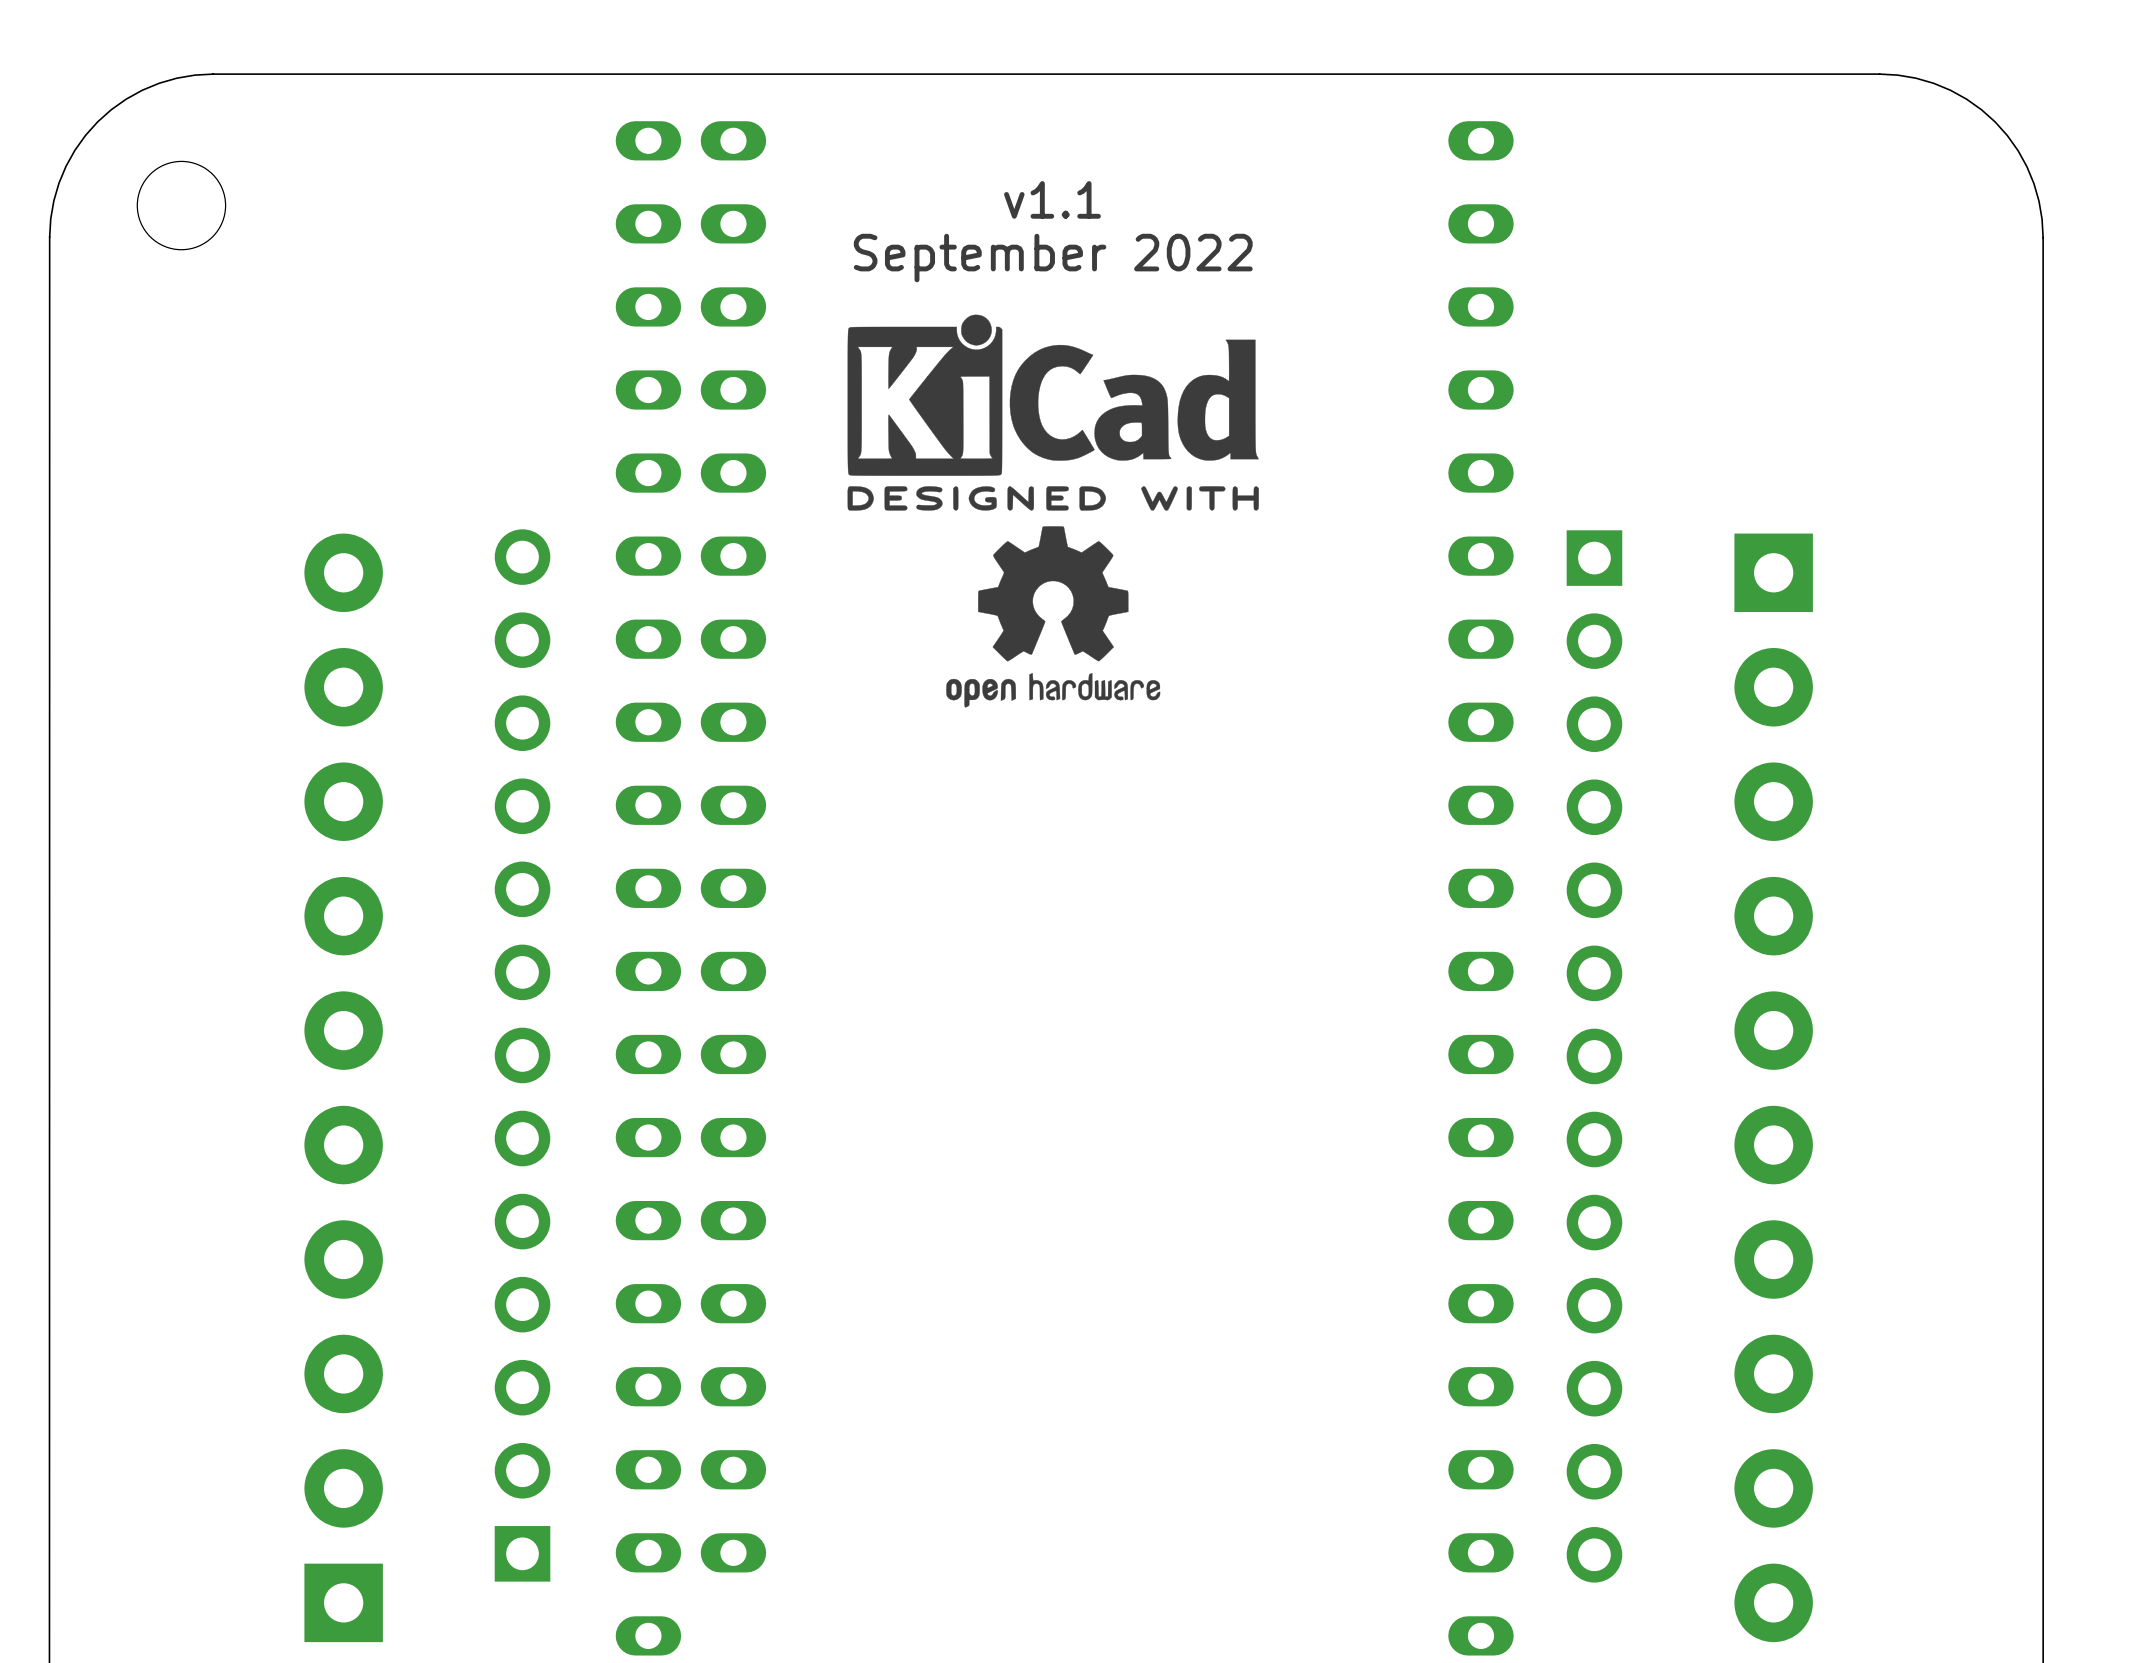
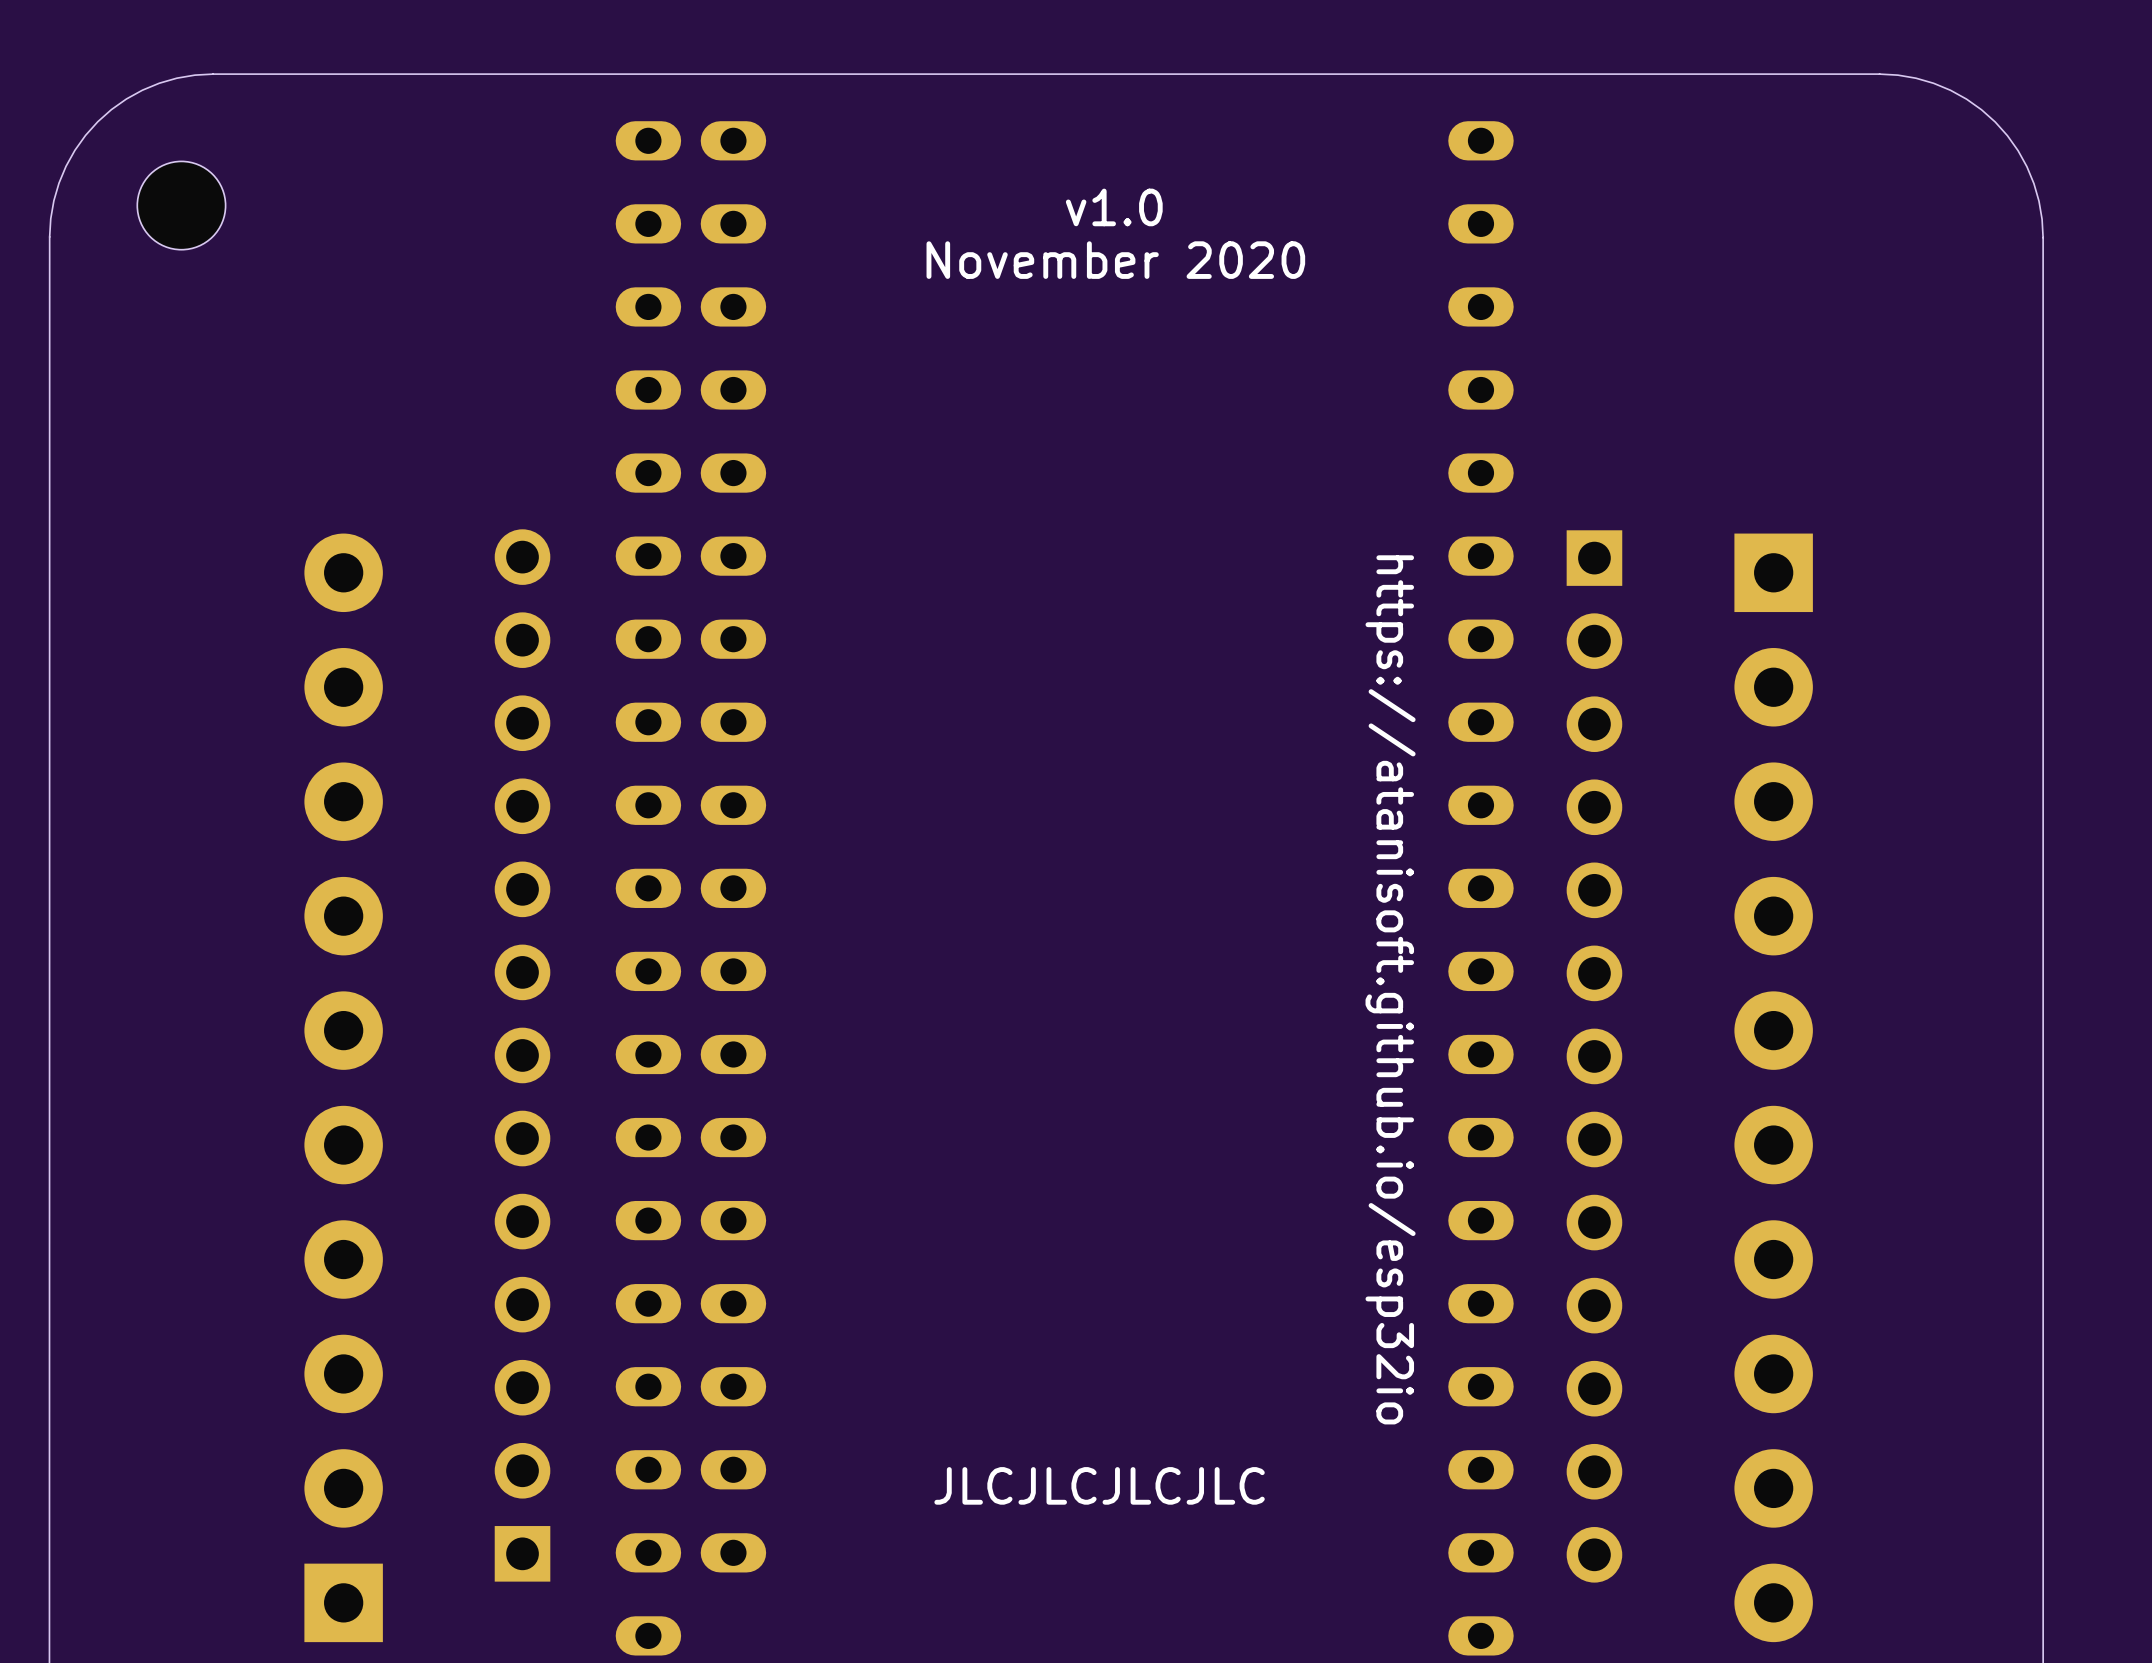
text: v1.1 (1052, 199) -> v1.0 (1114, 207)
text: September 2022 (1053, 258) -> November 2020 (1115, 260)
drawing: [847, 314, 1259, 708] -> none
text: none -> https://atanisoft.github.io/esp32io (1390, 989)
text: none -> JLCJLCJLCJLC (1099, 1485)

